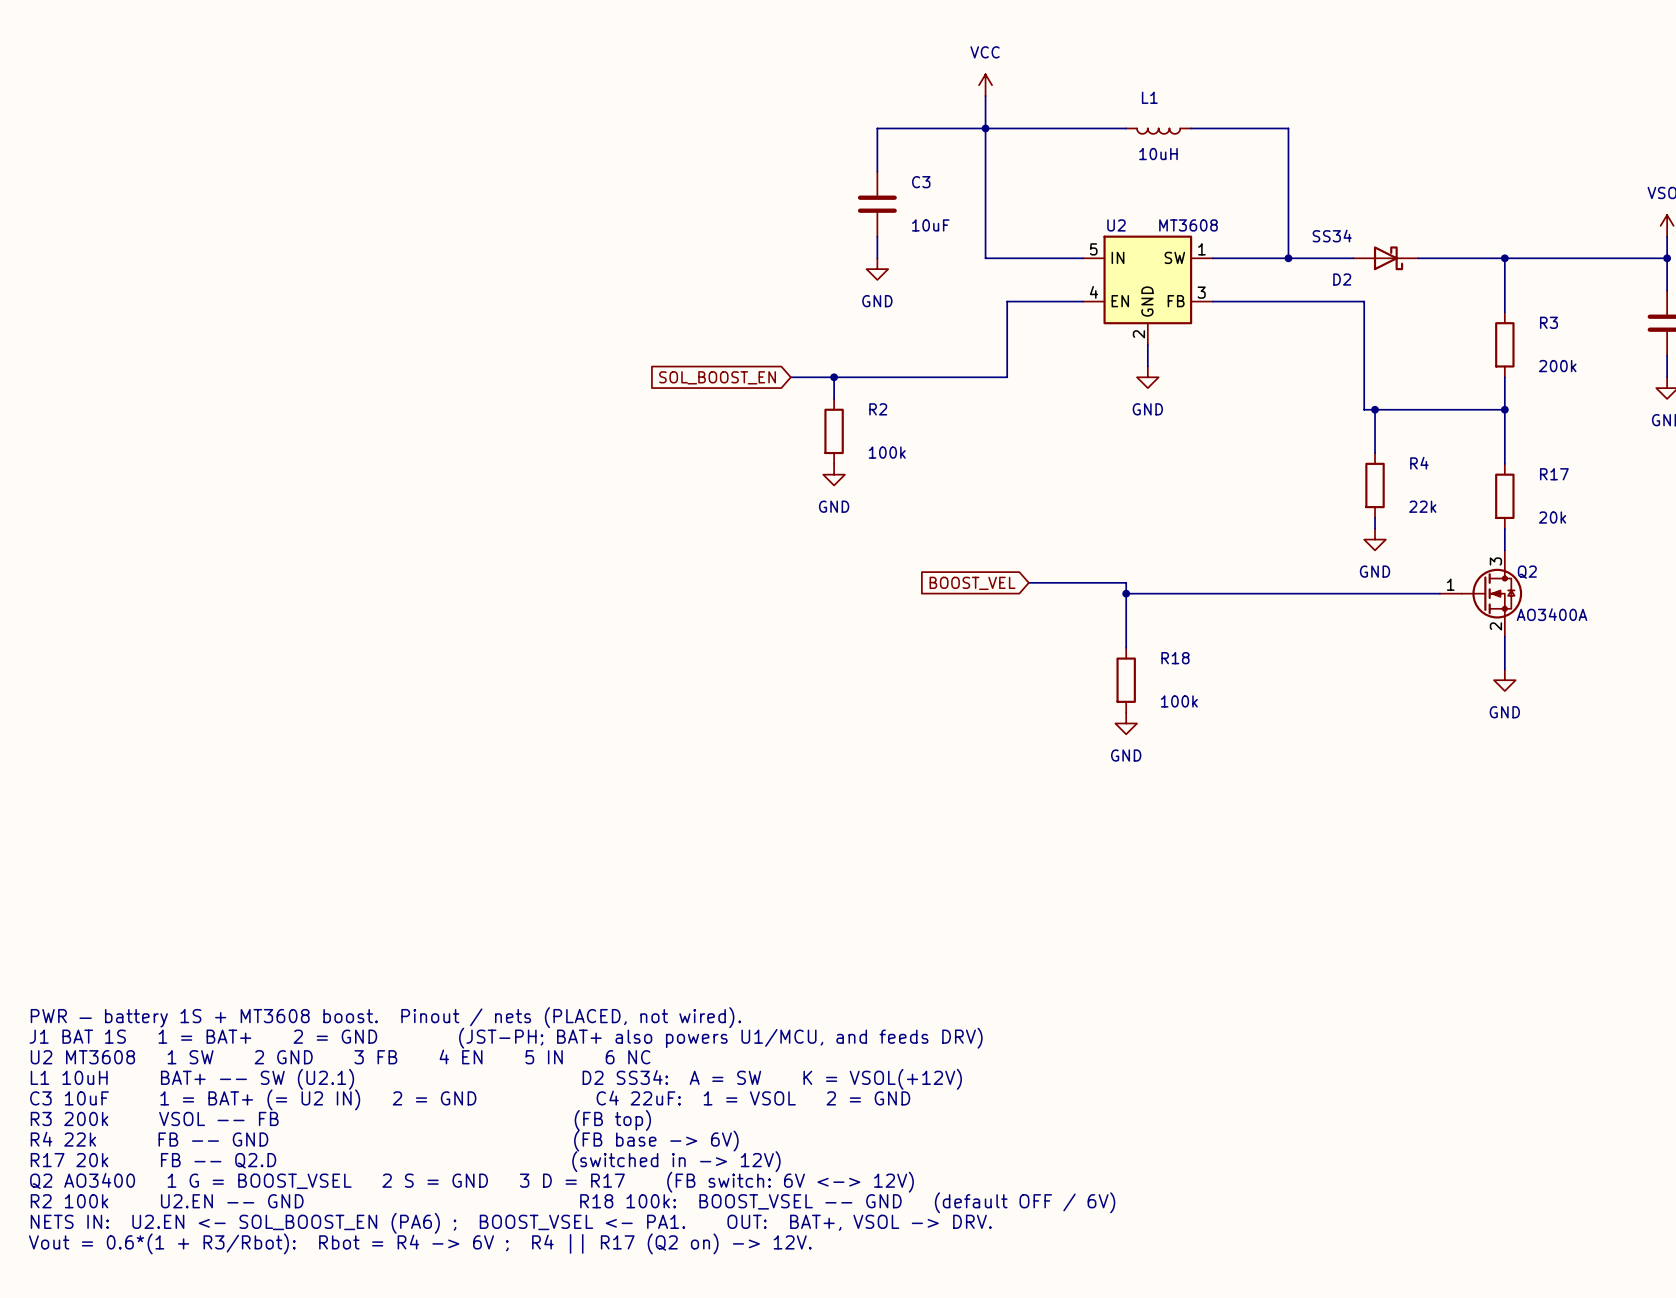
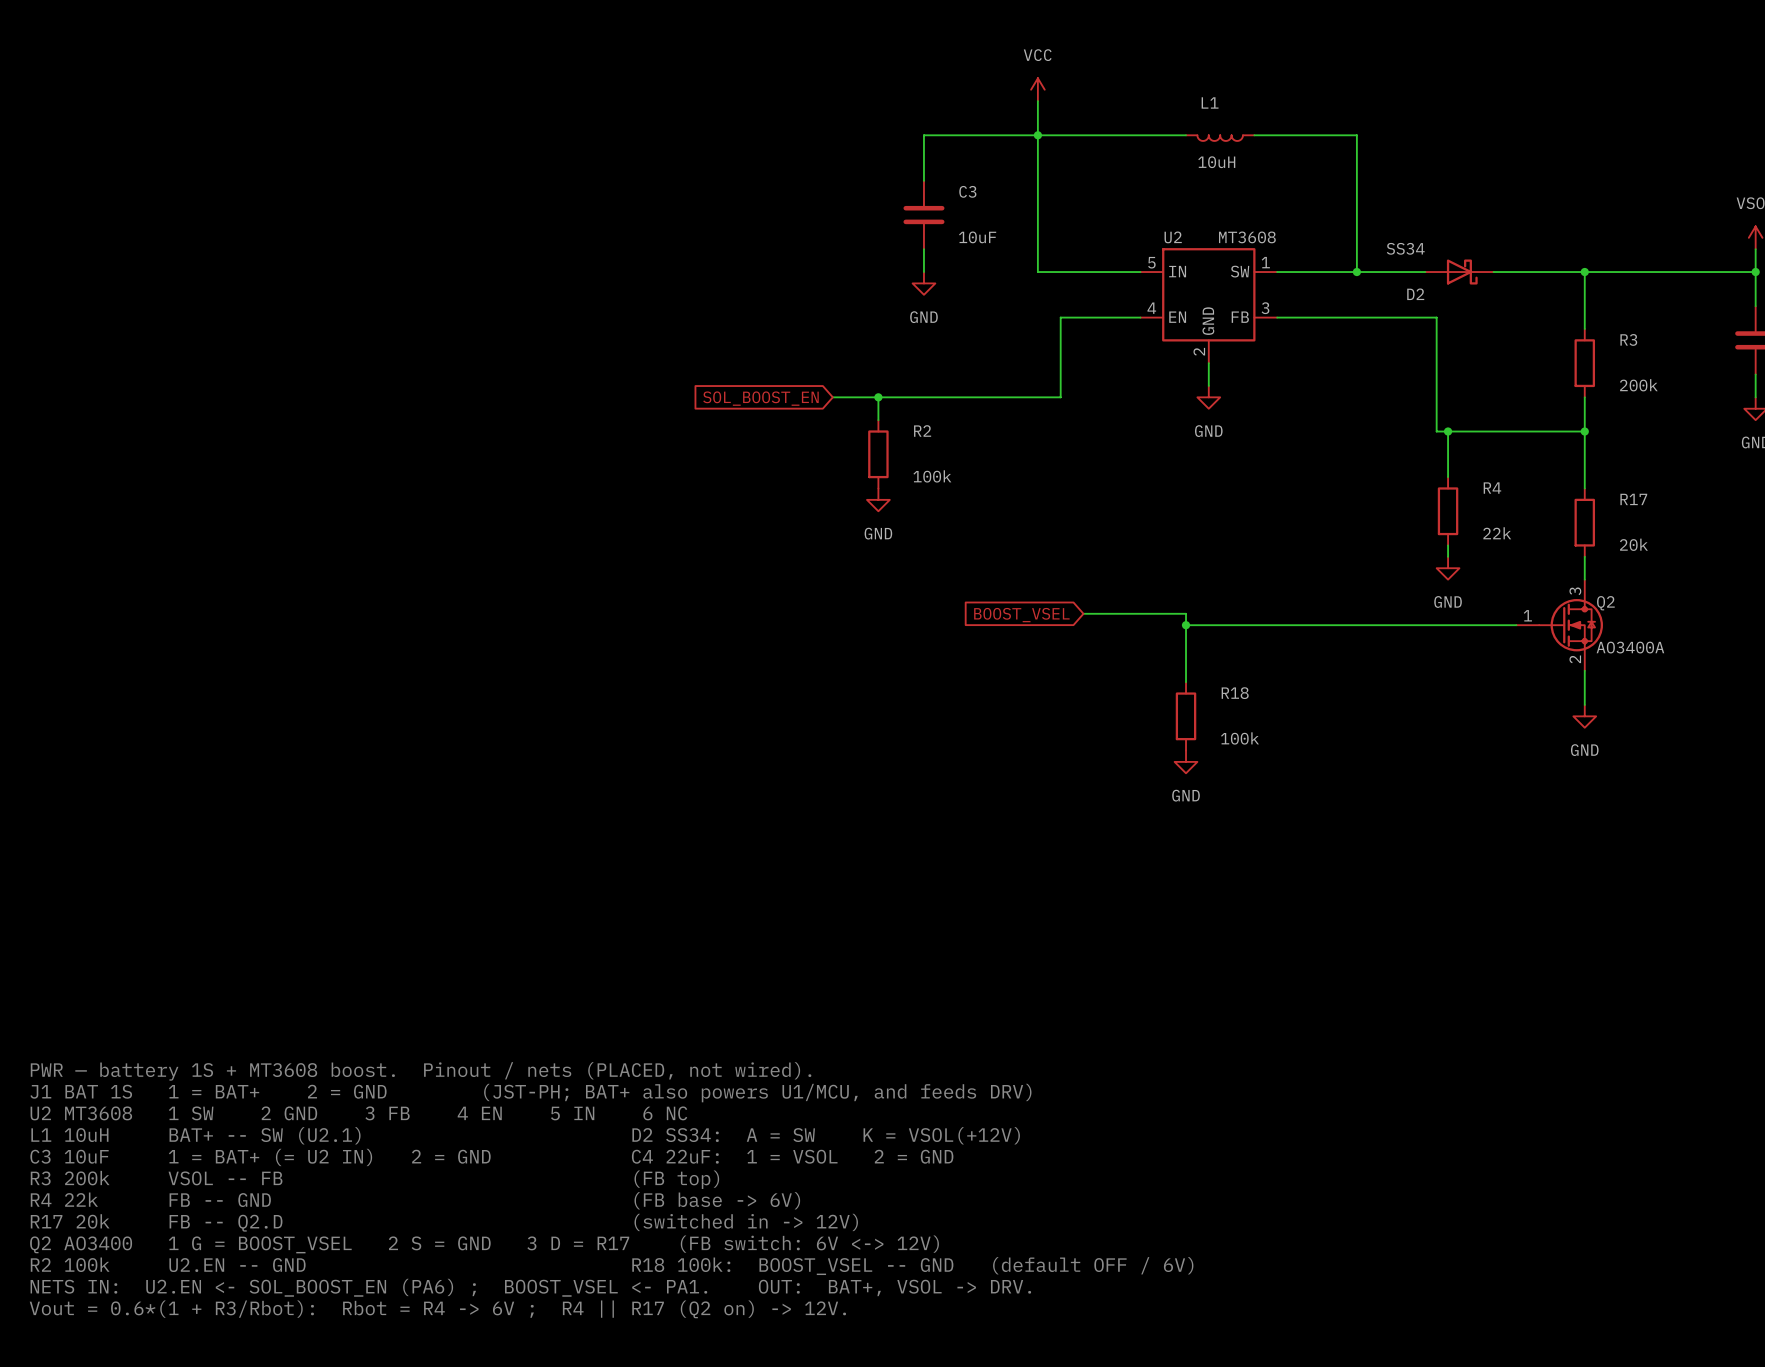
global label: BOOST_VEL (972, 583) -> BOOST_VSEL (1021, 615)

